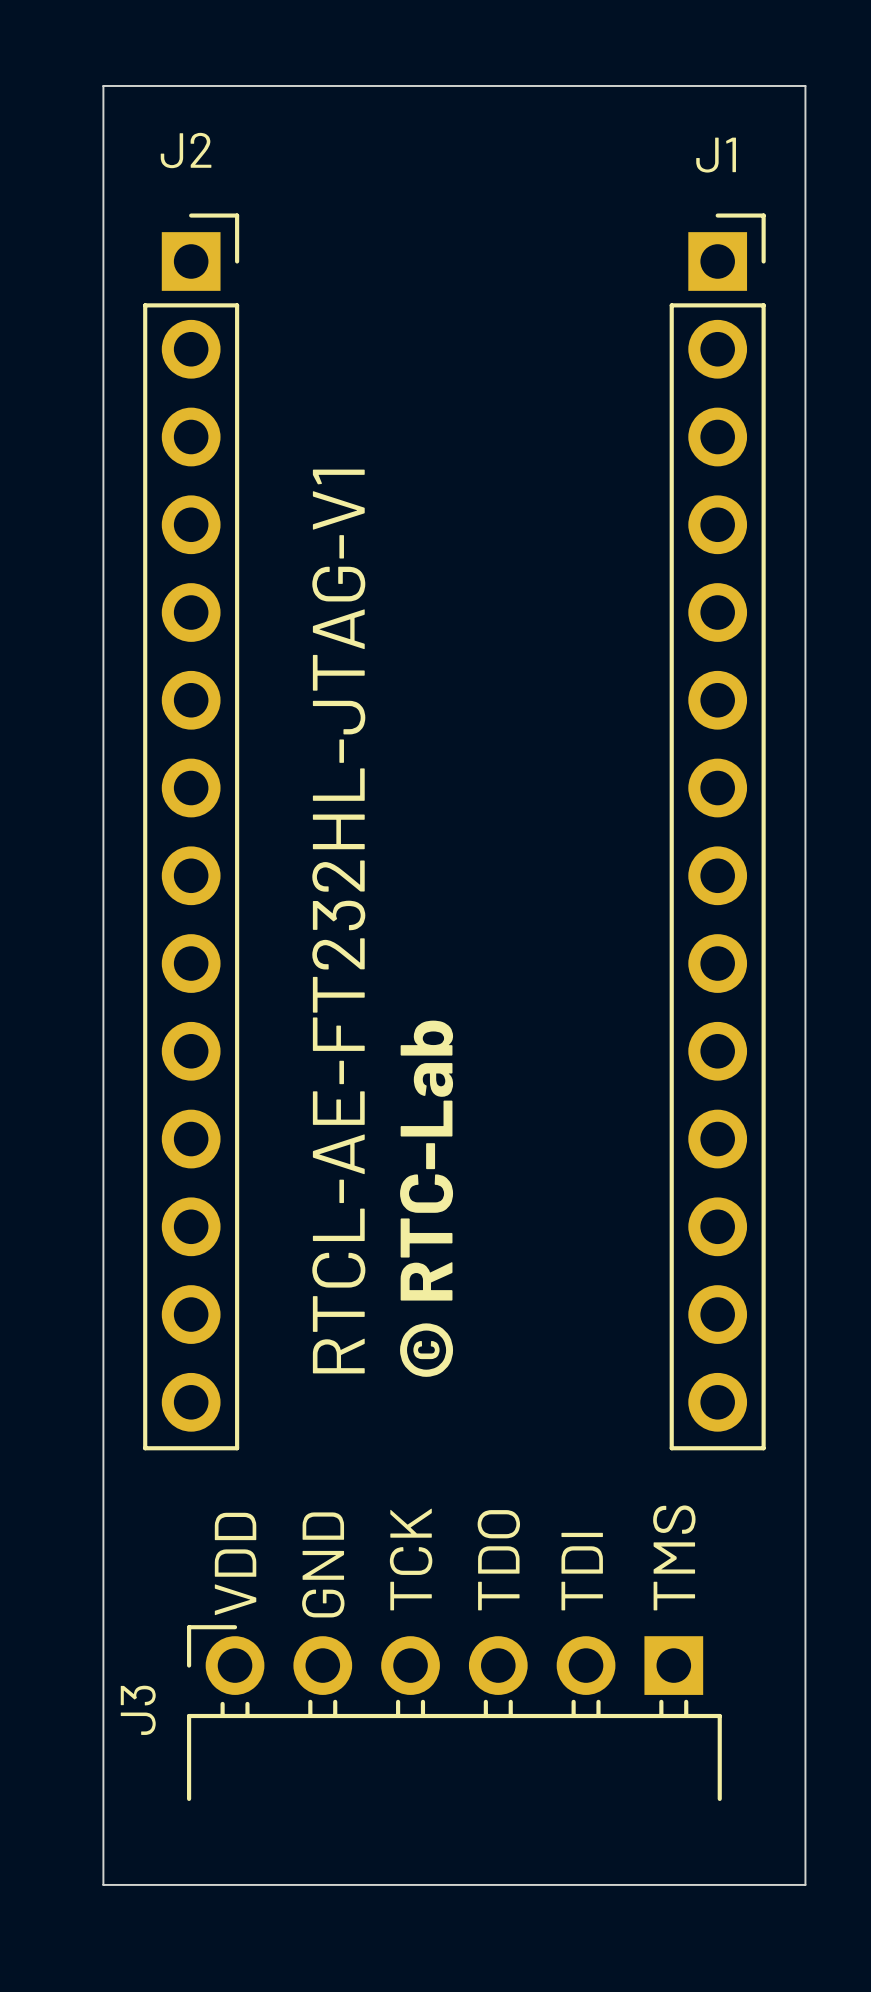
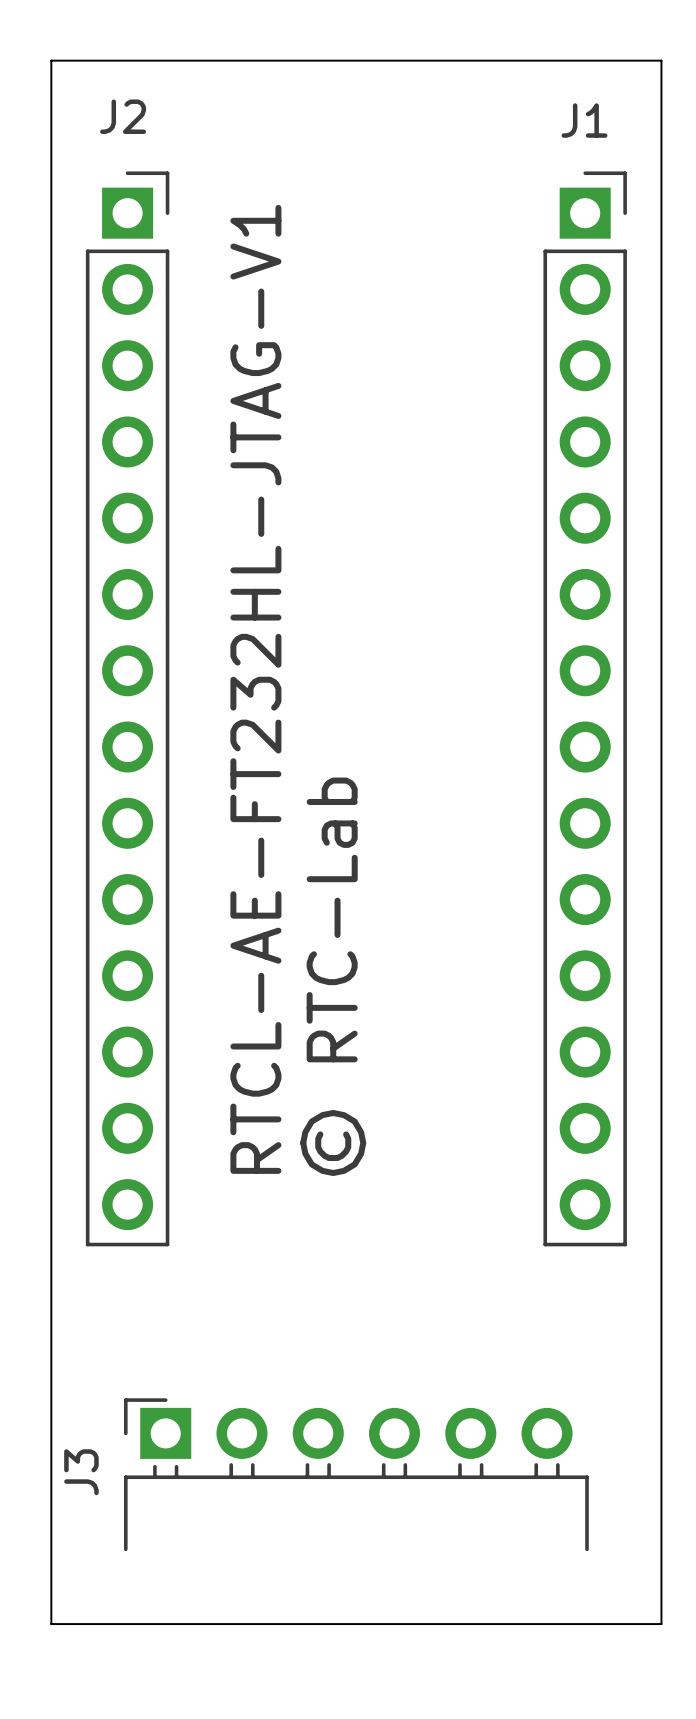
text: TMS (674, 1557) -> none
text: TCK (411, 1559) -> none
text: TDO (498, 1560) -> none
text: VDD (235, 1563) -> none
text: GND (323, 1564) -> none
text: TDI (582, 1571) -> none
J3 footprint: [187, 1625, 722, 1801] -> [123, 1398, 589, 1552]

